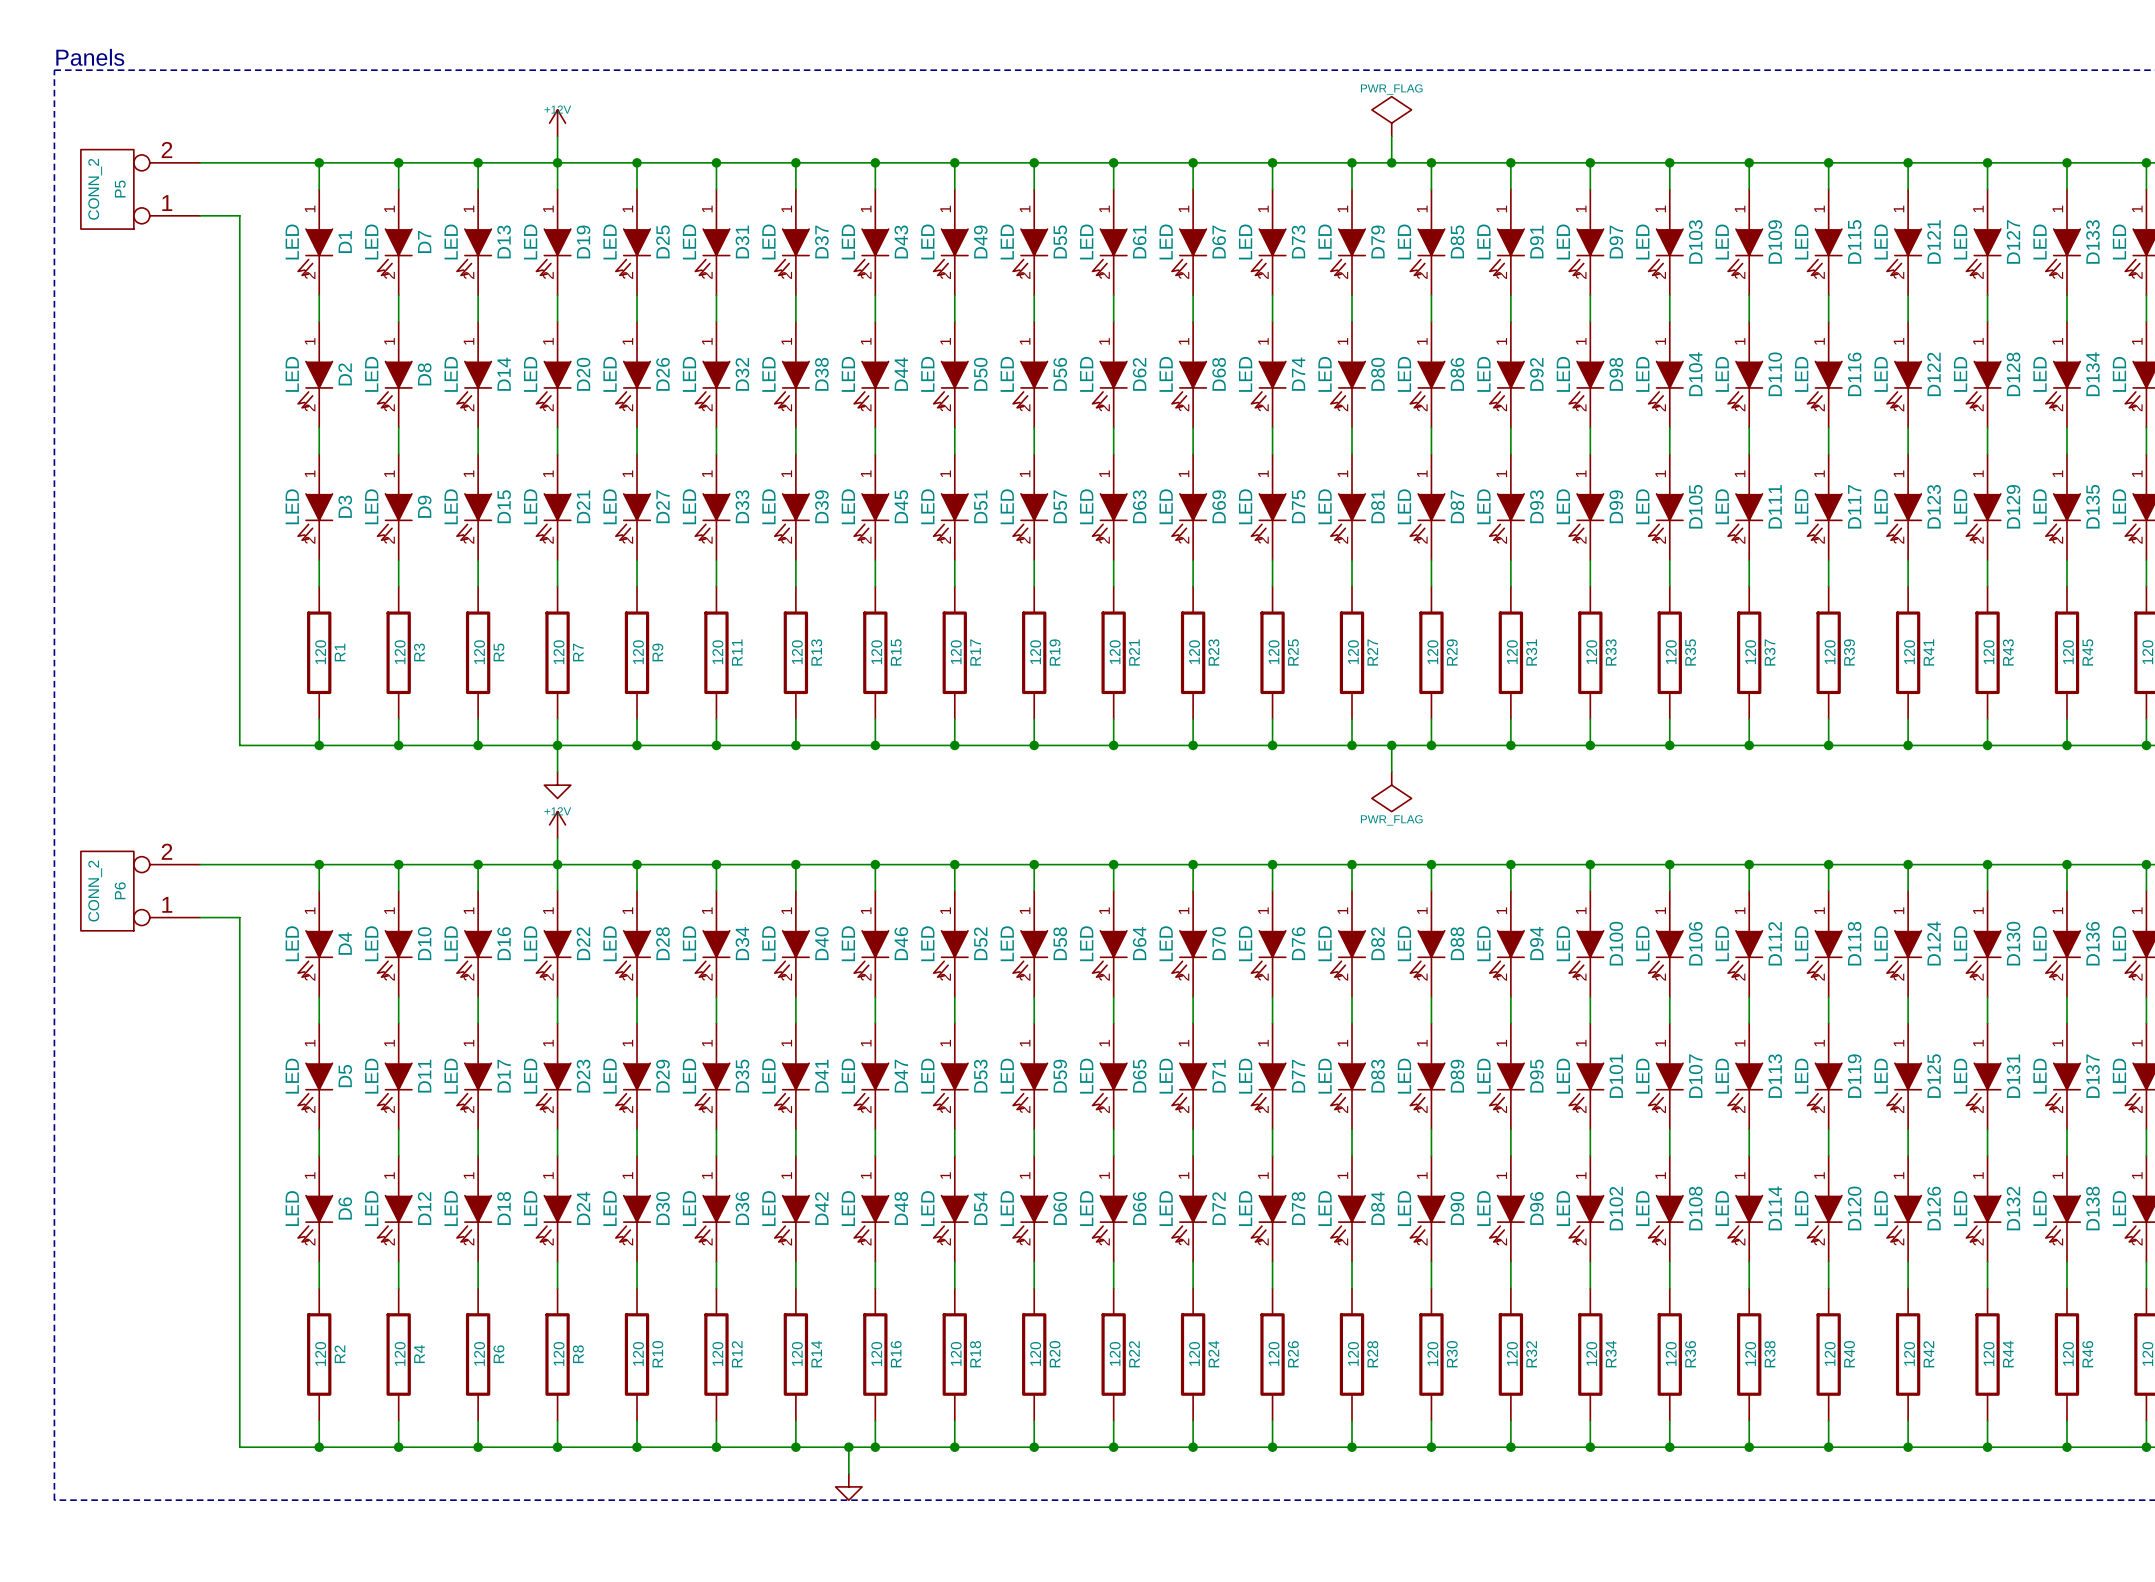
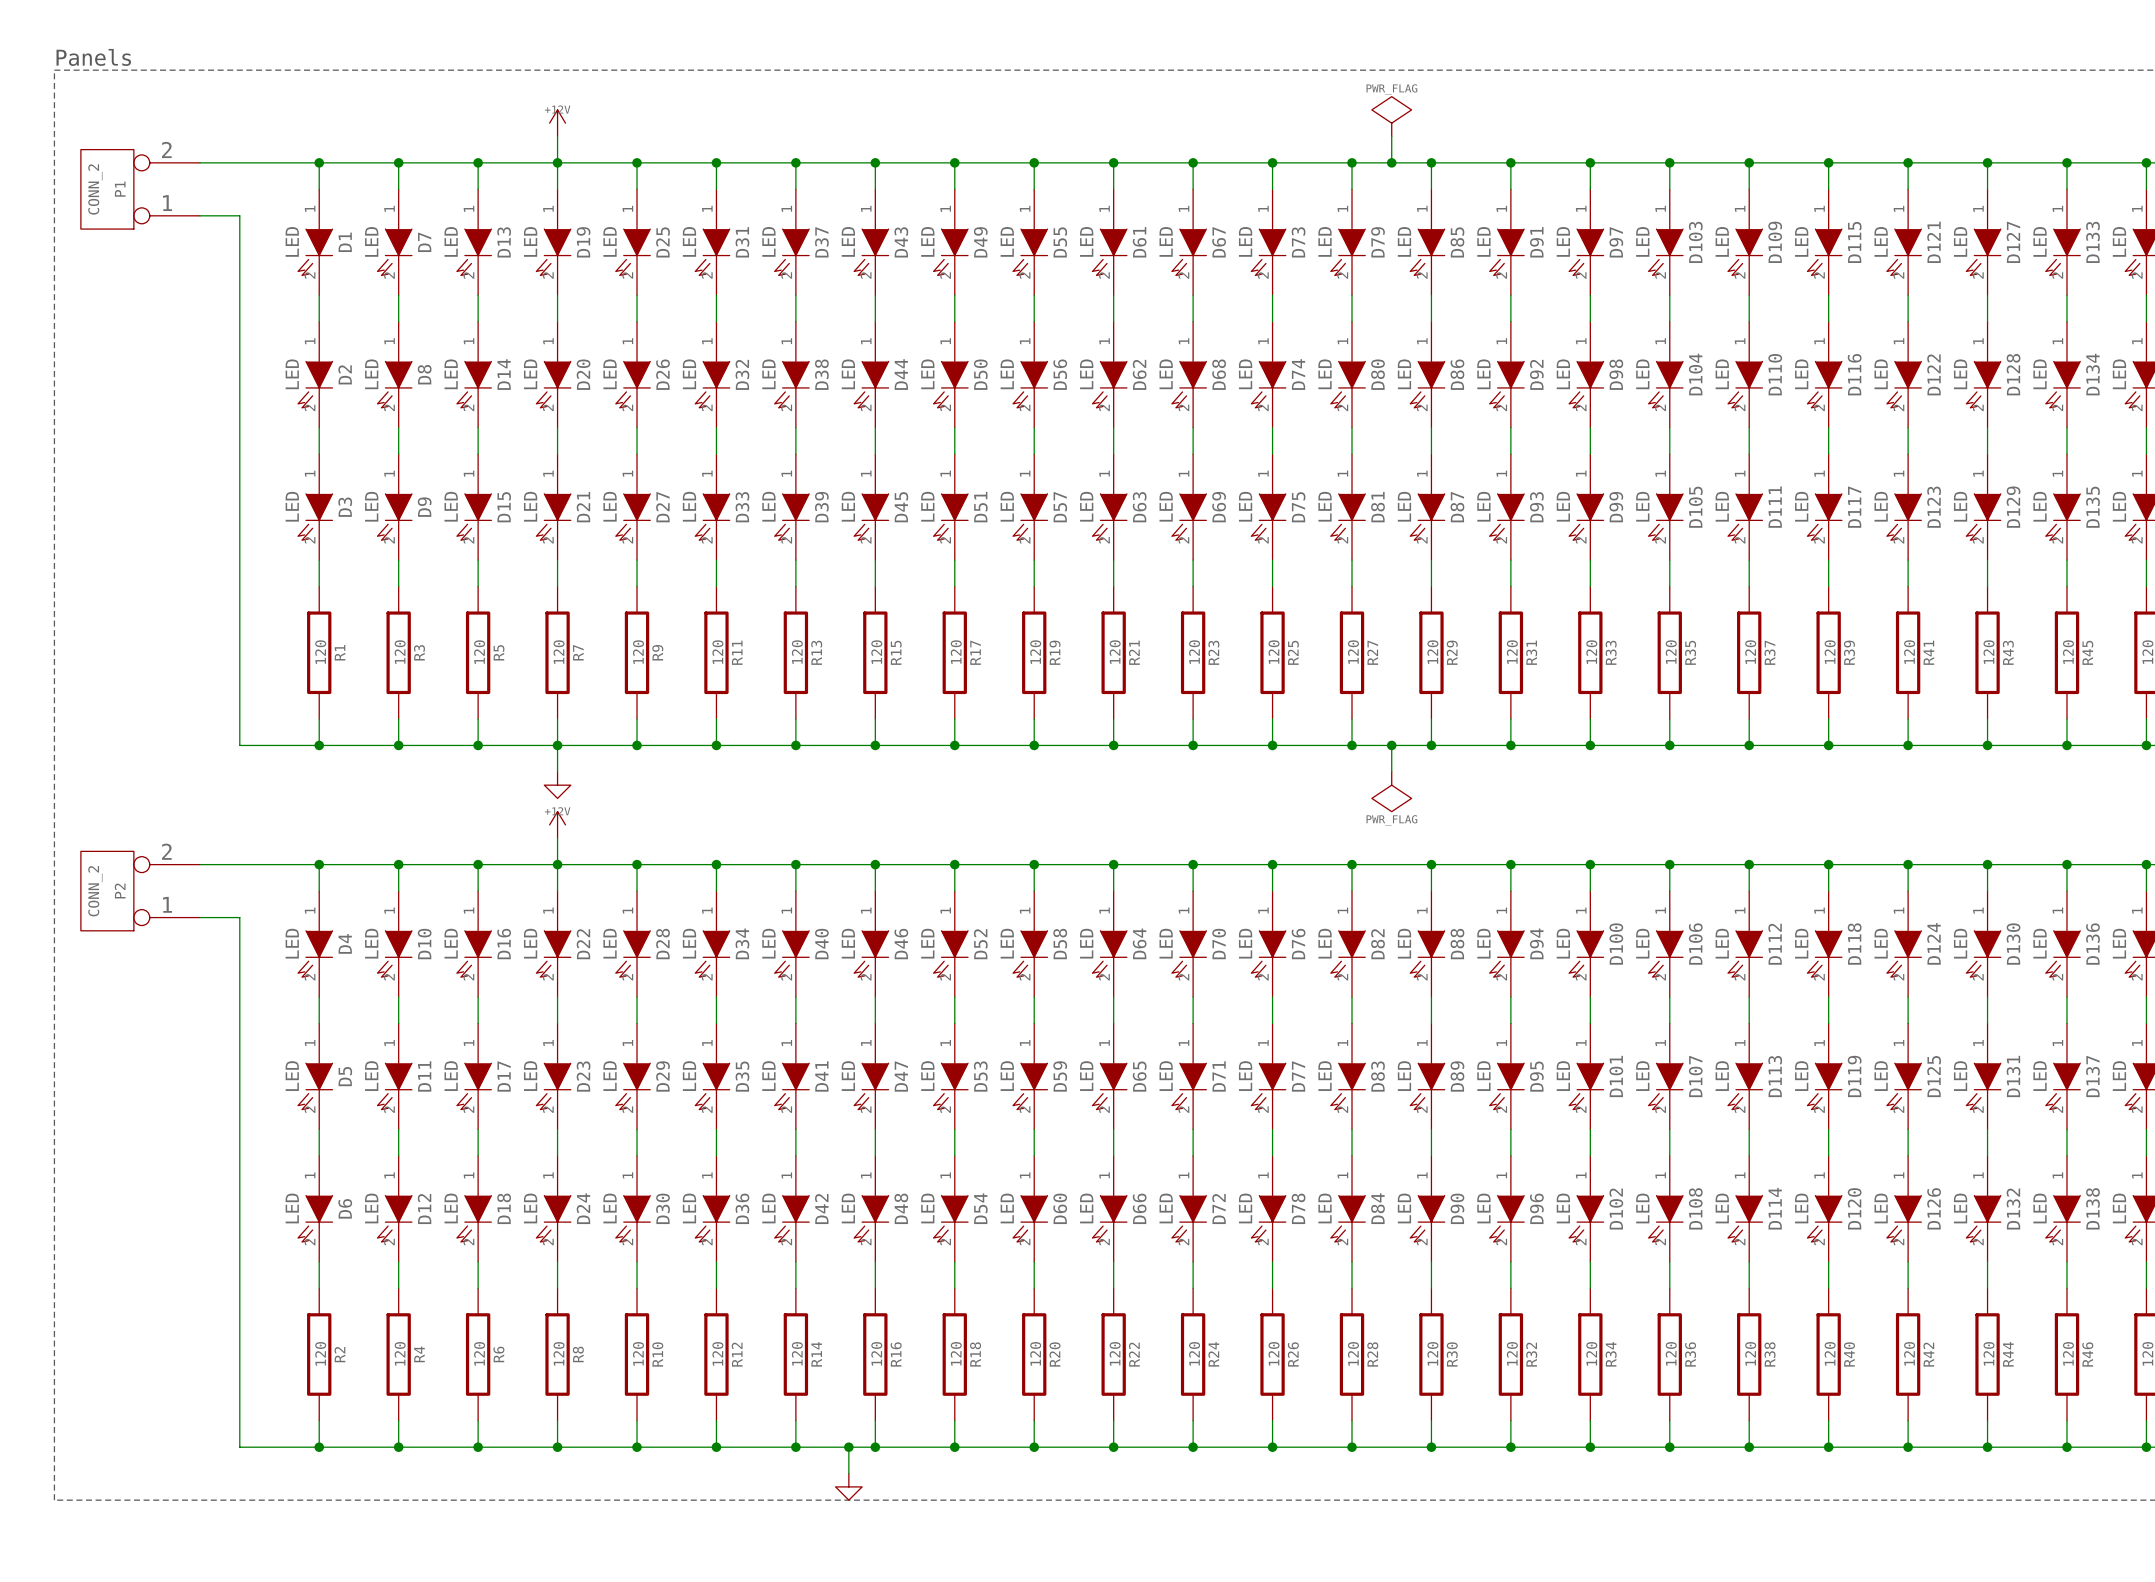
P5 name: P5 (120, 189) -> P1 (120, 189)
P6 name: P6 (120, 890) -> P2 (120, 891)

